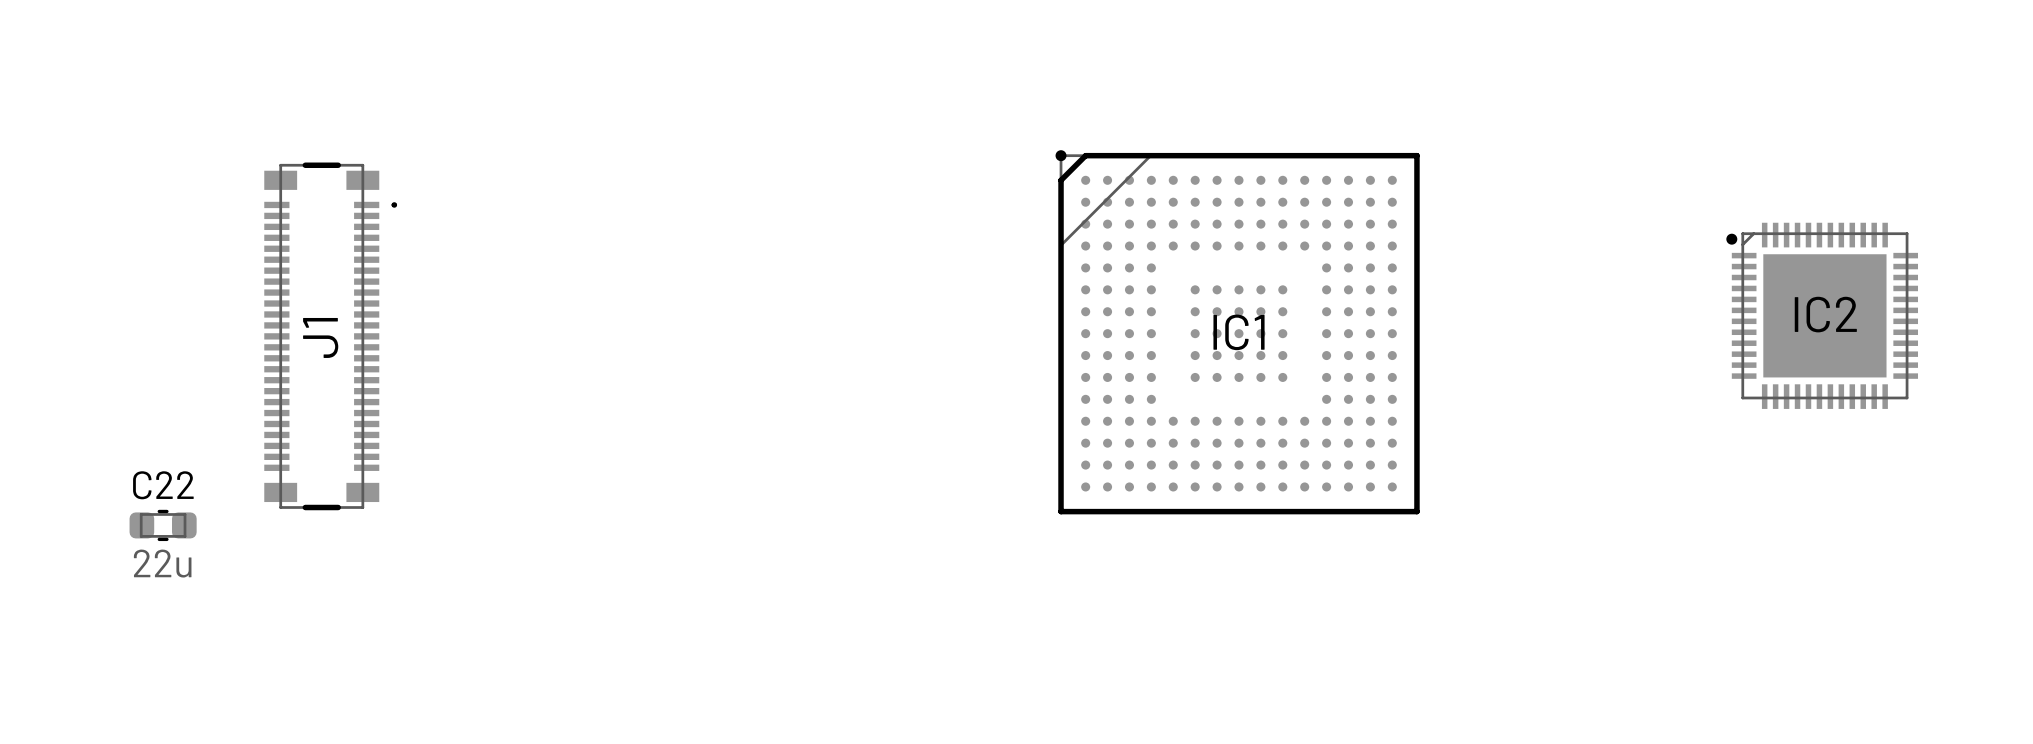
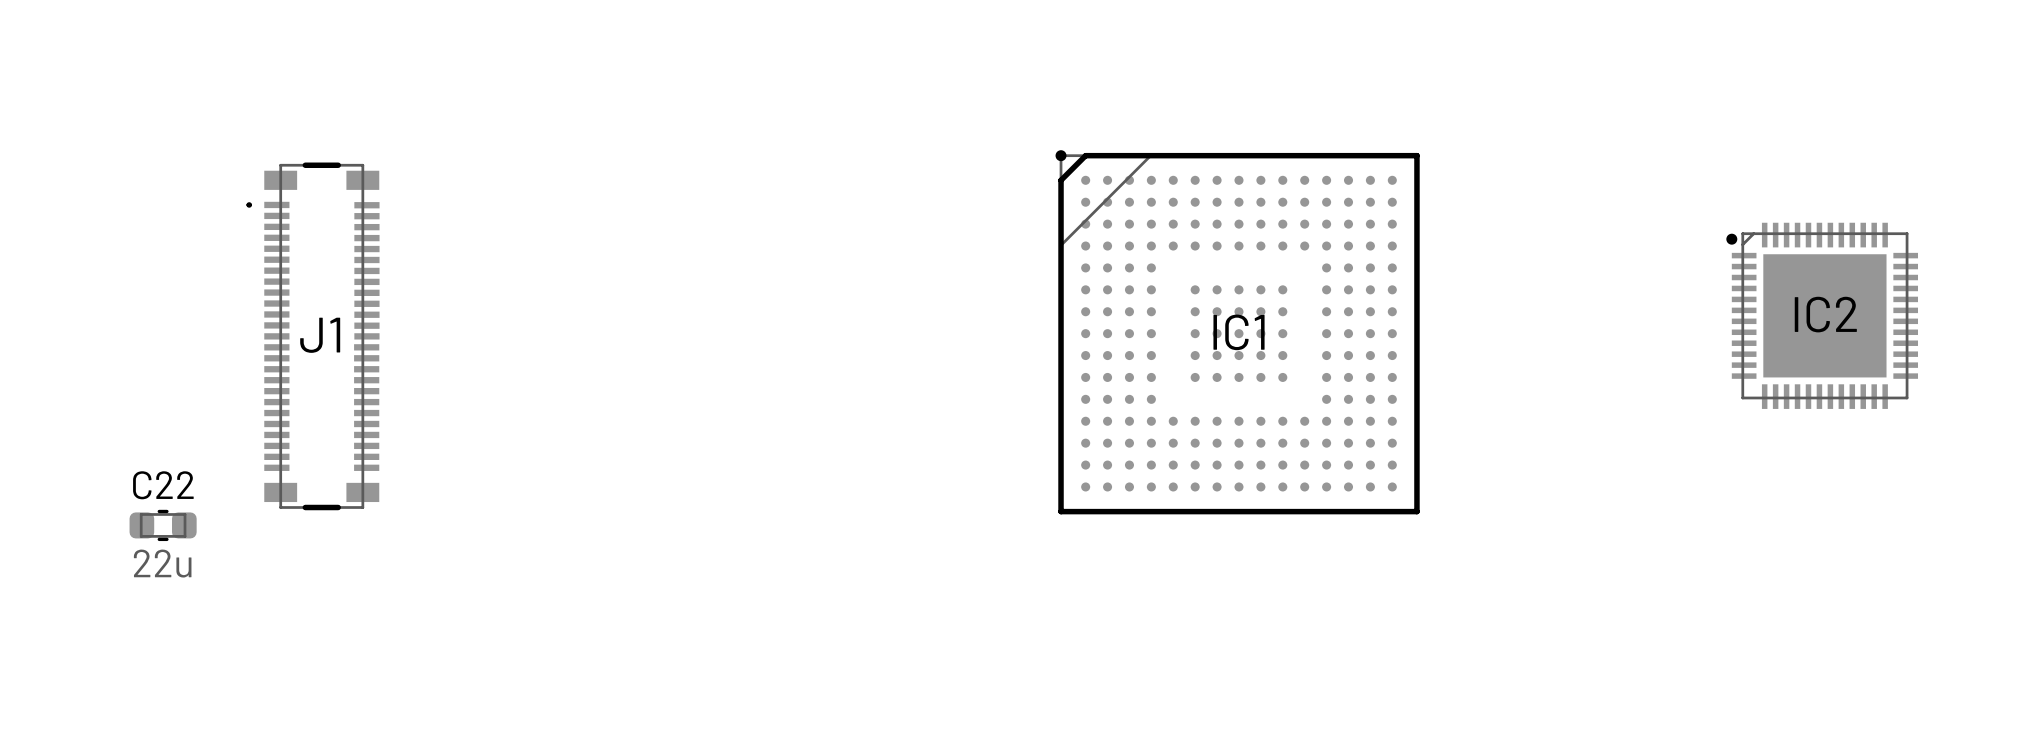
J1 footprint: [264, 162, 398, 511] -> [246, 162, 380, 511]

